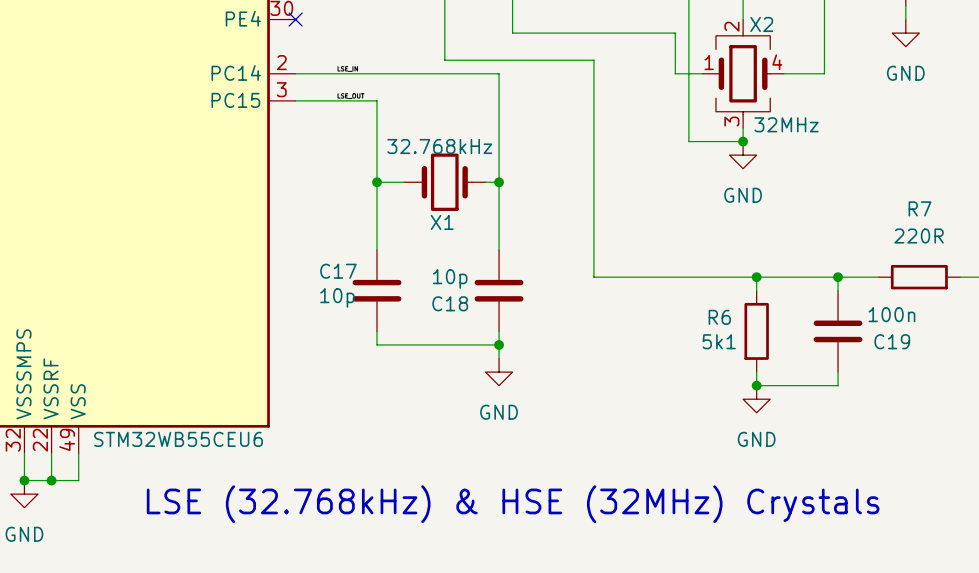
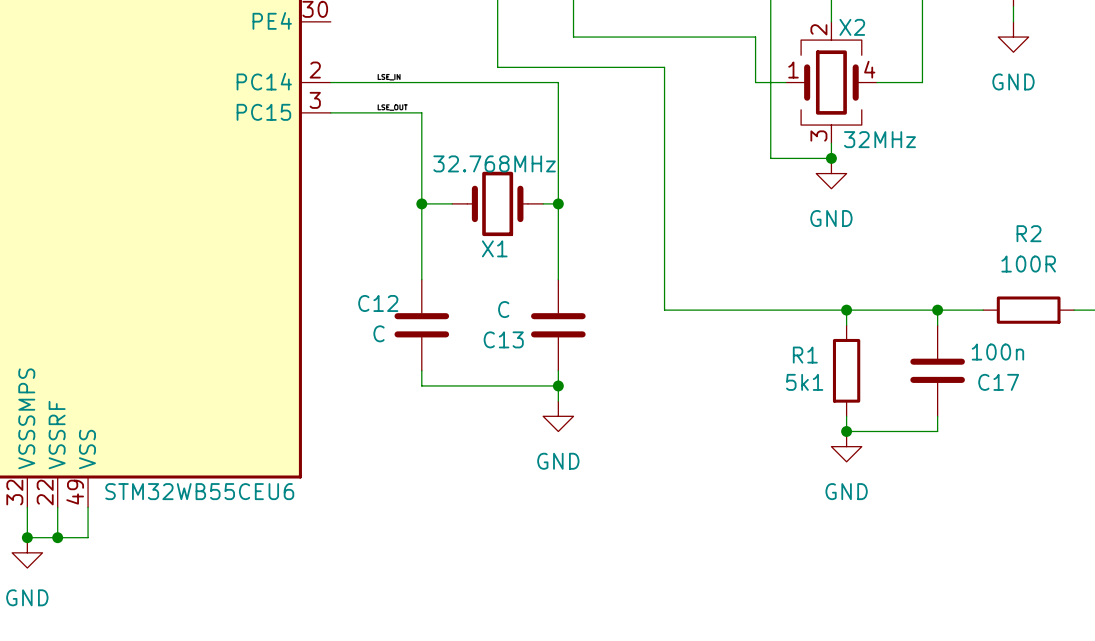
no-connect mark: (295, 19) -> none
X1 value: 32.768kHz (439, 146) -> 32.768MHz (494, 163)
R7 name: R7 (920, 208) -> R2 (1029, 233)
R7 value: 220R (919, 235) -> 100R (1028, 264)
C17 name: C17 (338, 271) -> C12 (378, 303)
C18 value: 10p (450, 278) -> C (503, 309)
C17 value: 10p (337, 297) -> C (379, 333)
C18 name: C18 (450, 303) -> C13 (503, 339)
R6 name: R6 (719, 317) -> R1 (805, 355)
C19 name: C19 (892, 341) -> C17 (998, 382)
text: LSE (32.768kHz) & HSE (32MHz) Crystals (513, 504) -> none

